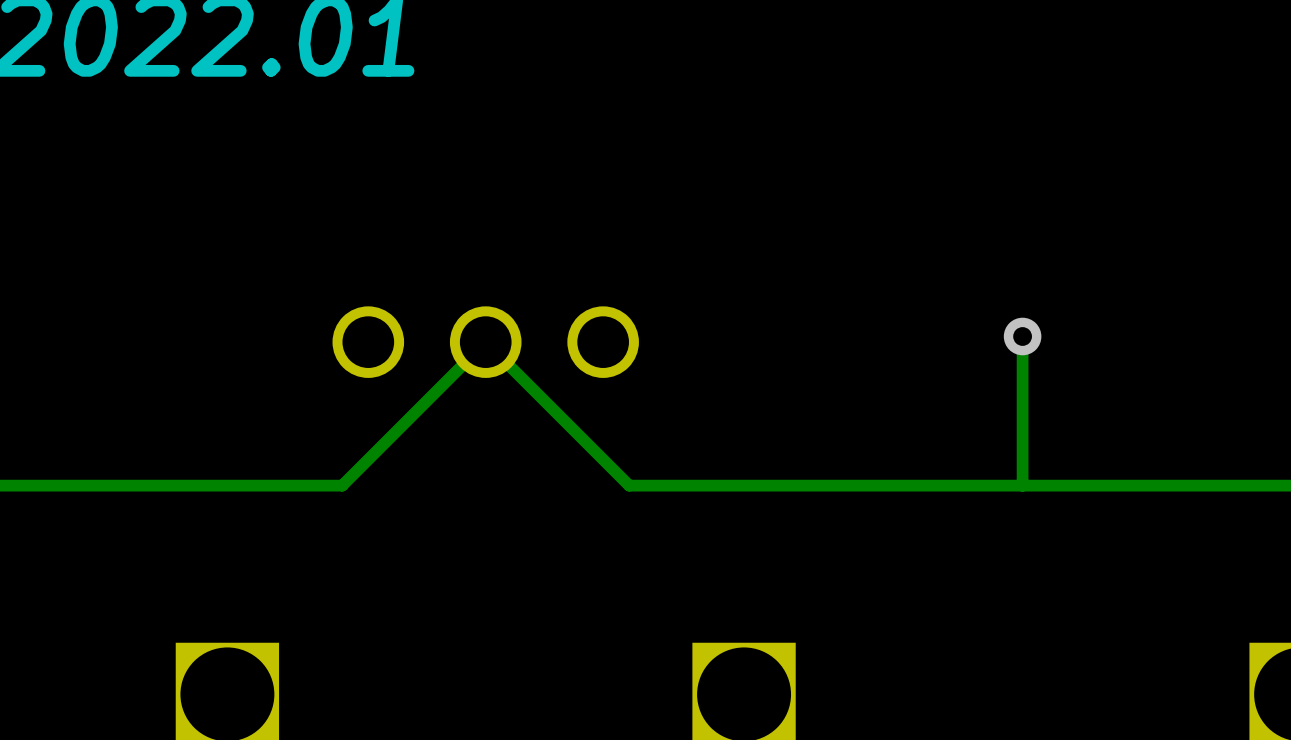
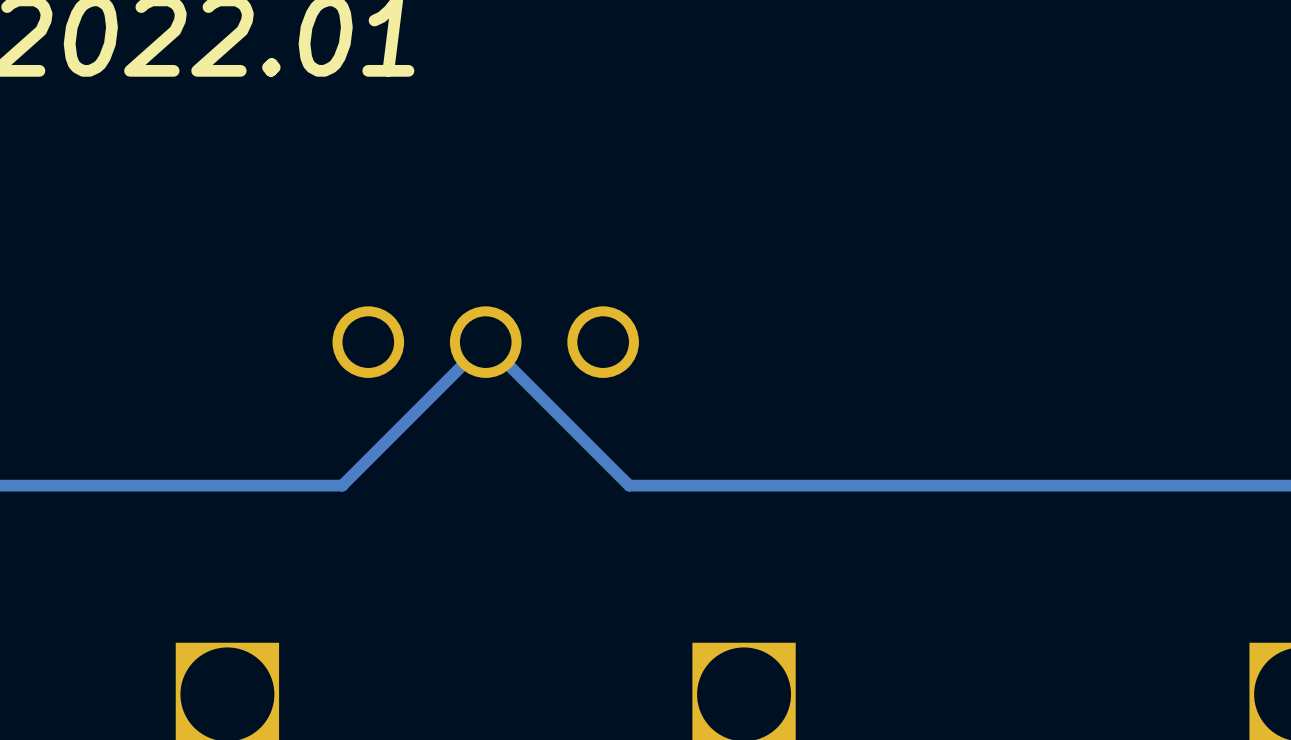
track: (1022, 336) (1022, 485) -> none
via: (1022, 336) -> none

